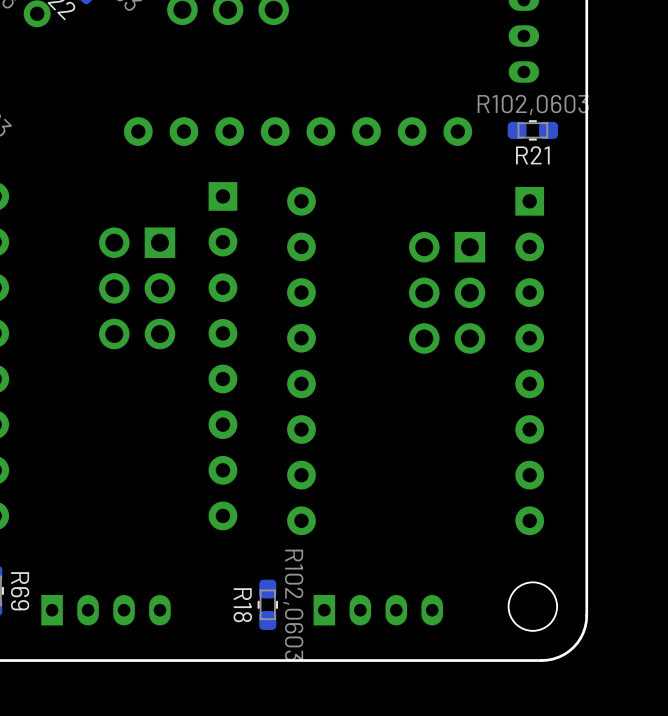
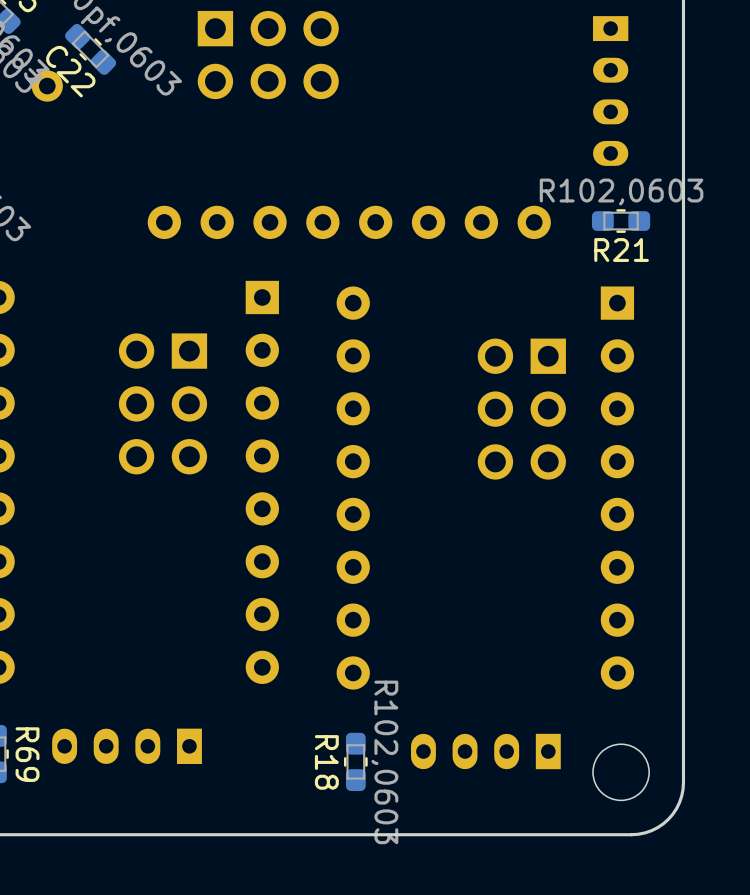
R18 position: (267, 604) -> (355, 761)
part rotation: 0° (106, 610) -> 180° (127, 746)
part rotation: 0° (378, 610) -> 180° (485, 751)

